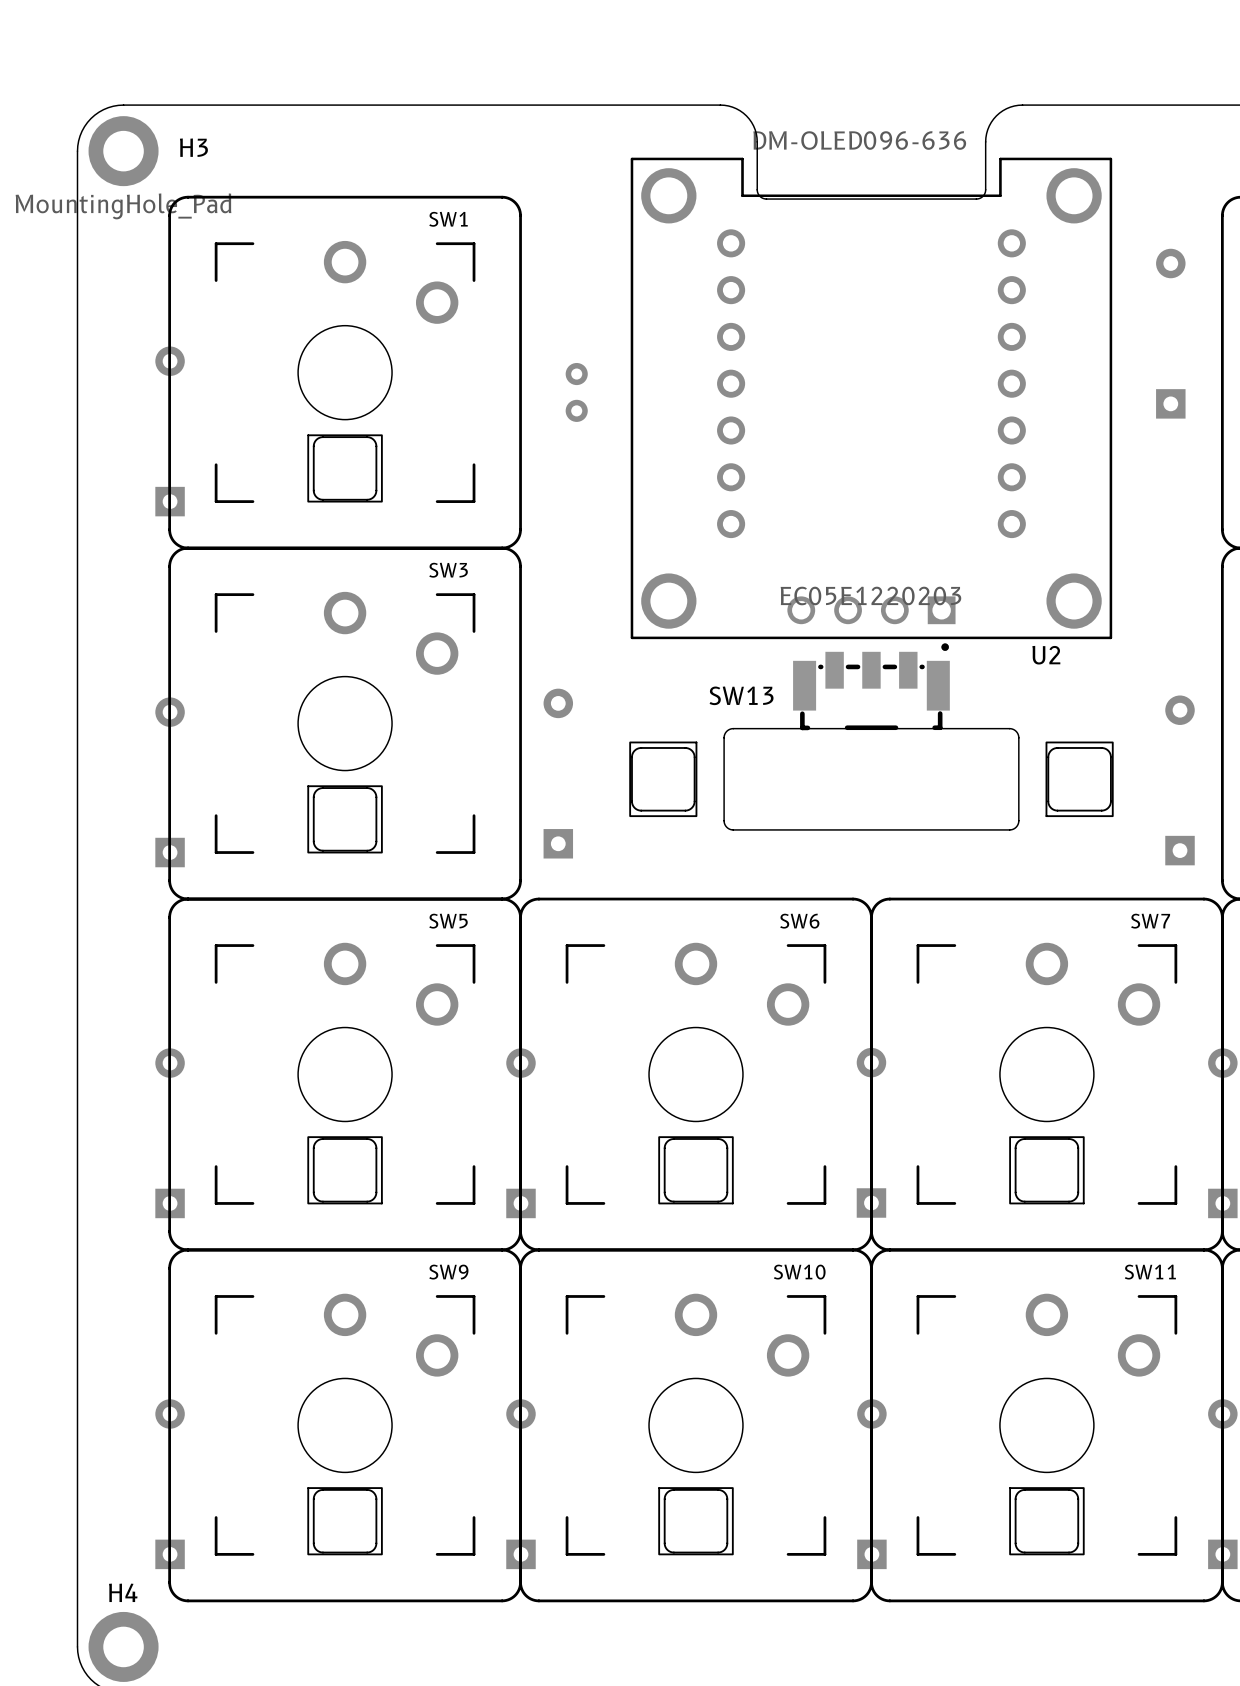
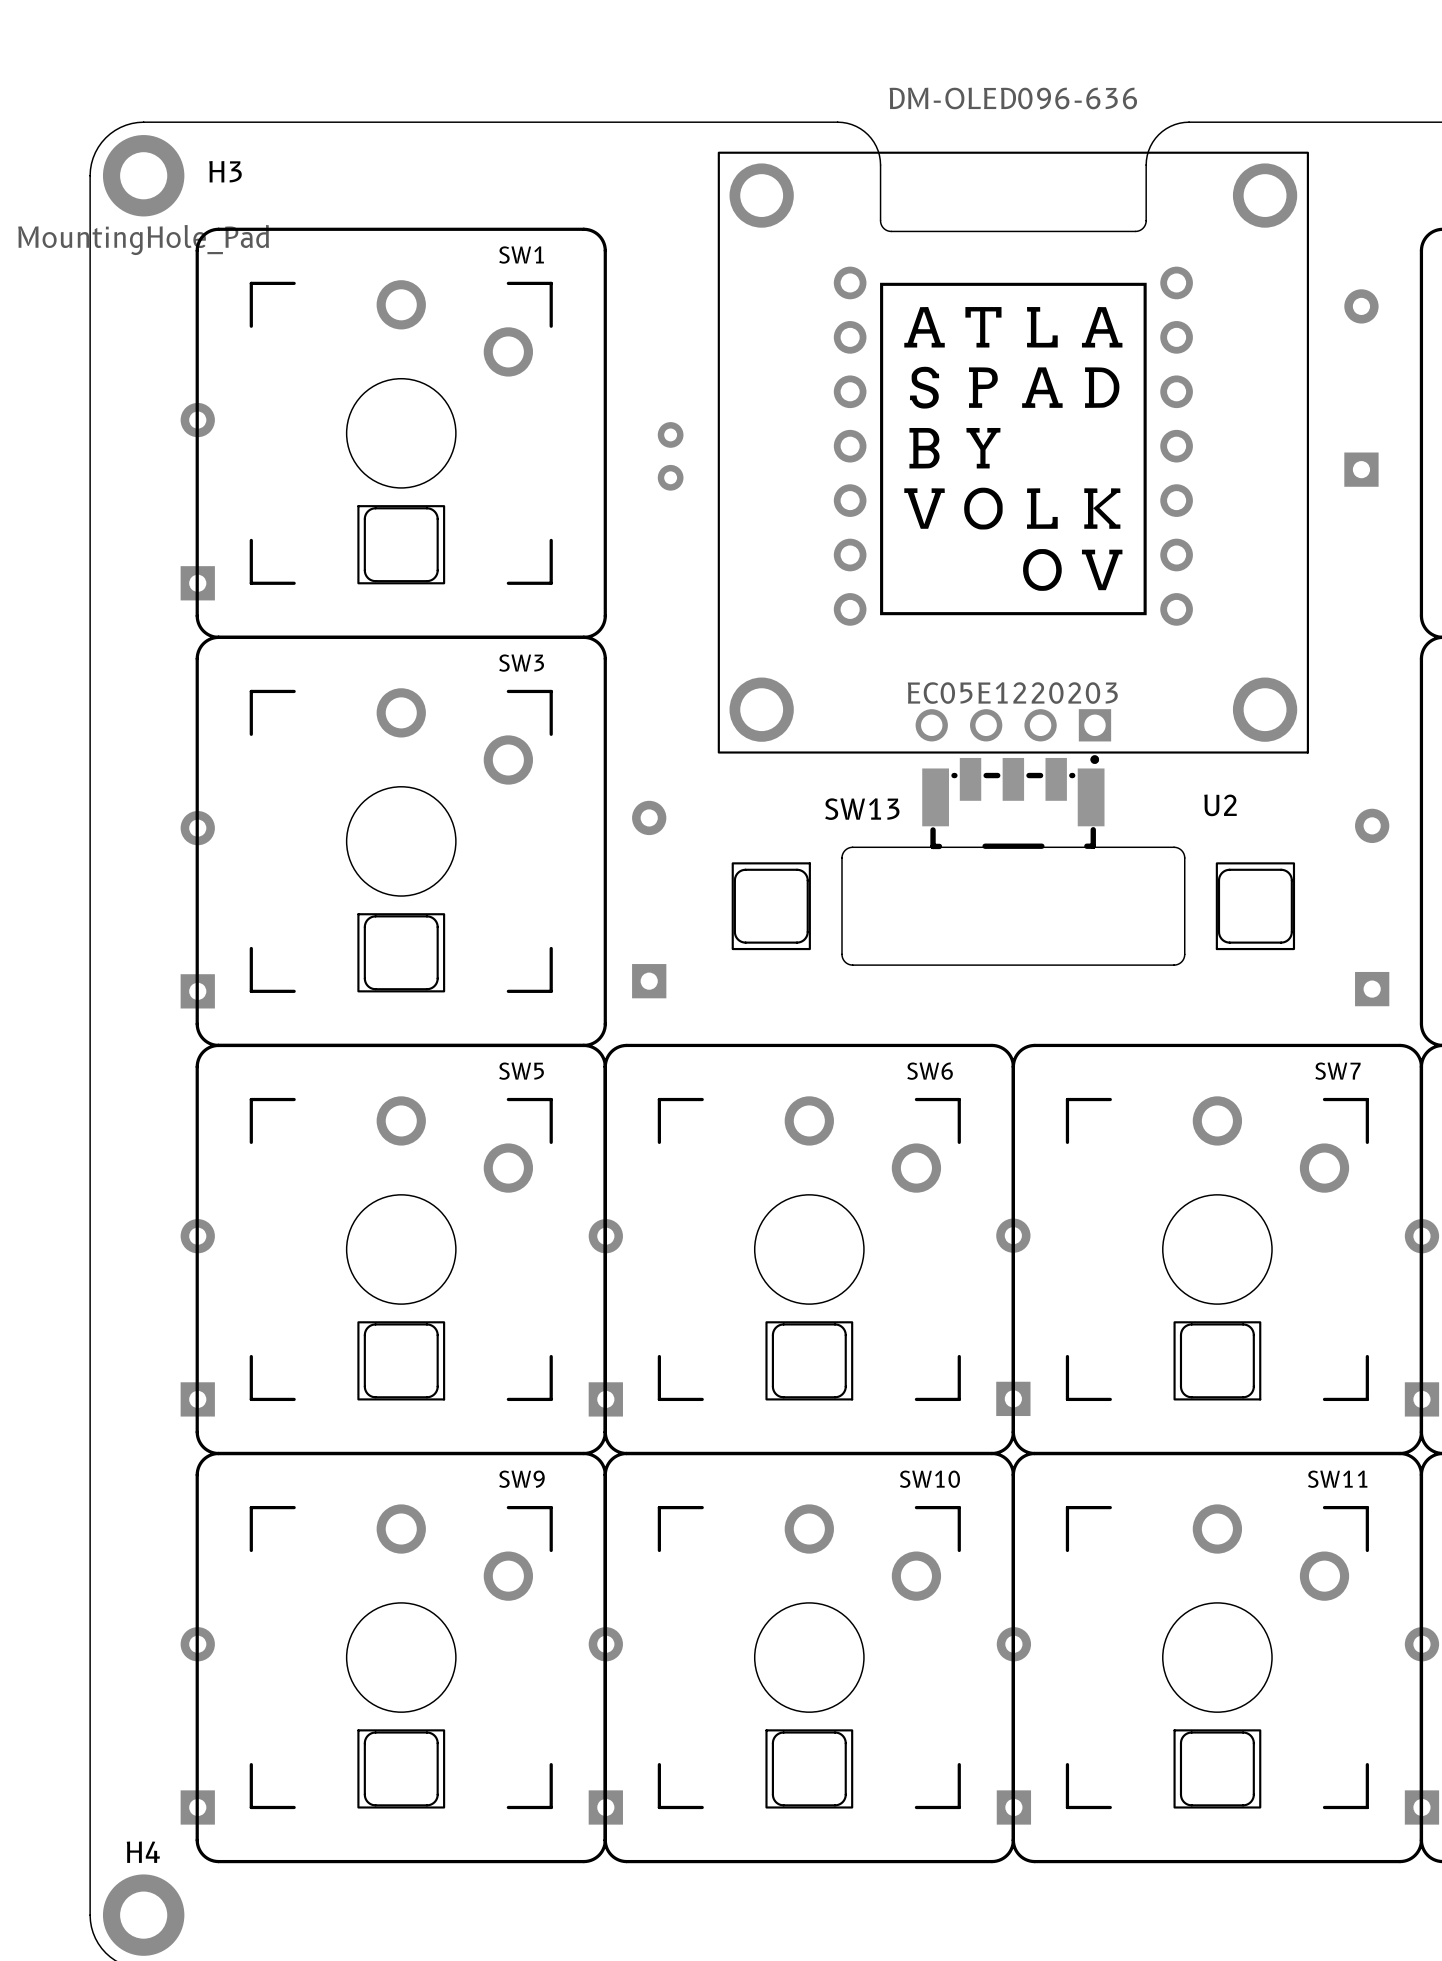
U2 value position: DM-OLED096-636 (859, 140) -> DM-OLED096-636 (1013, 98)
U2 footprint: [630, 157, 1113, 651] -> [717, 151, 1309, 764]
drawing: none -> [880, 282, 1147, 616]
U2 name position: U2 (1046, 655) -> U2 (1220, 805)

